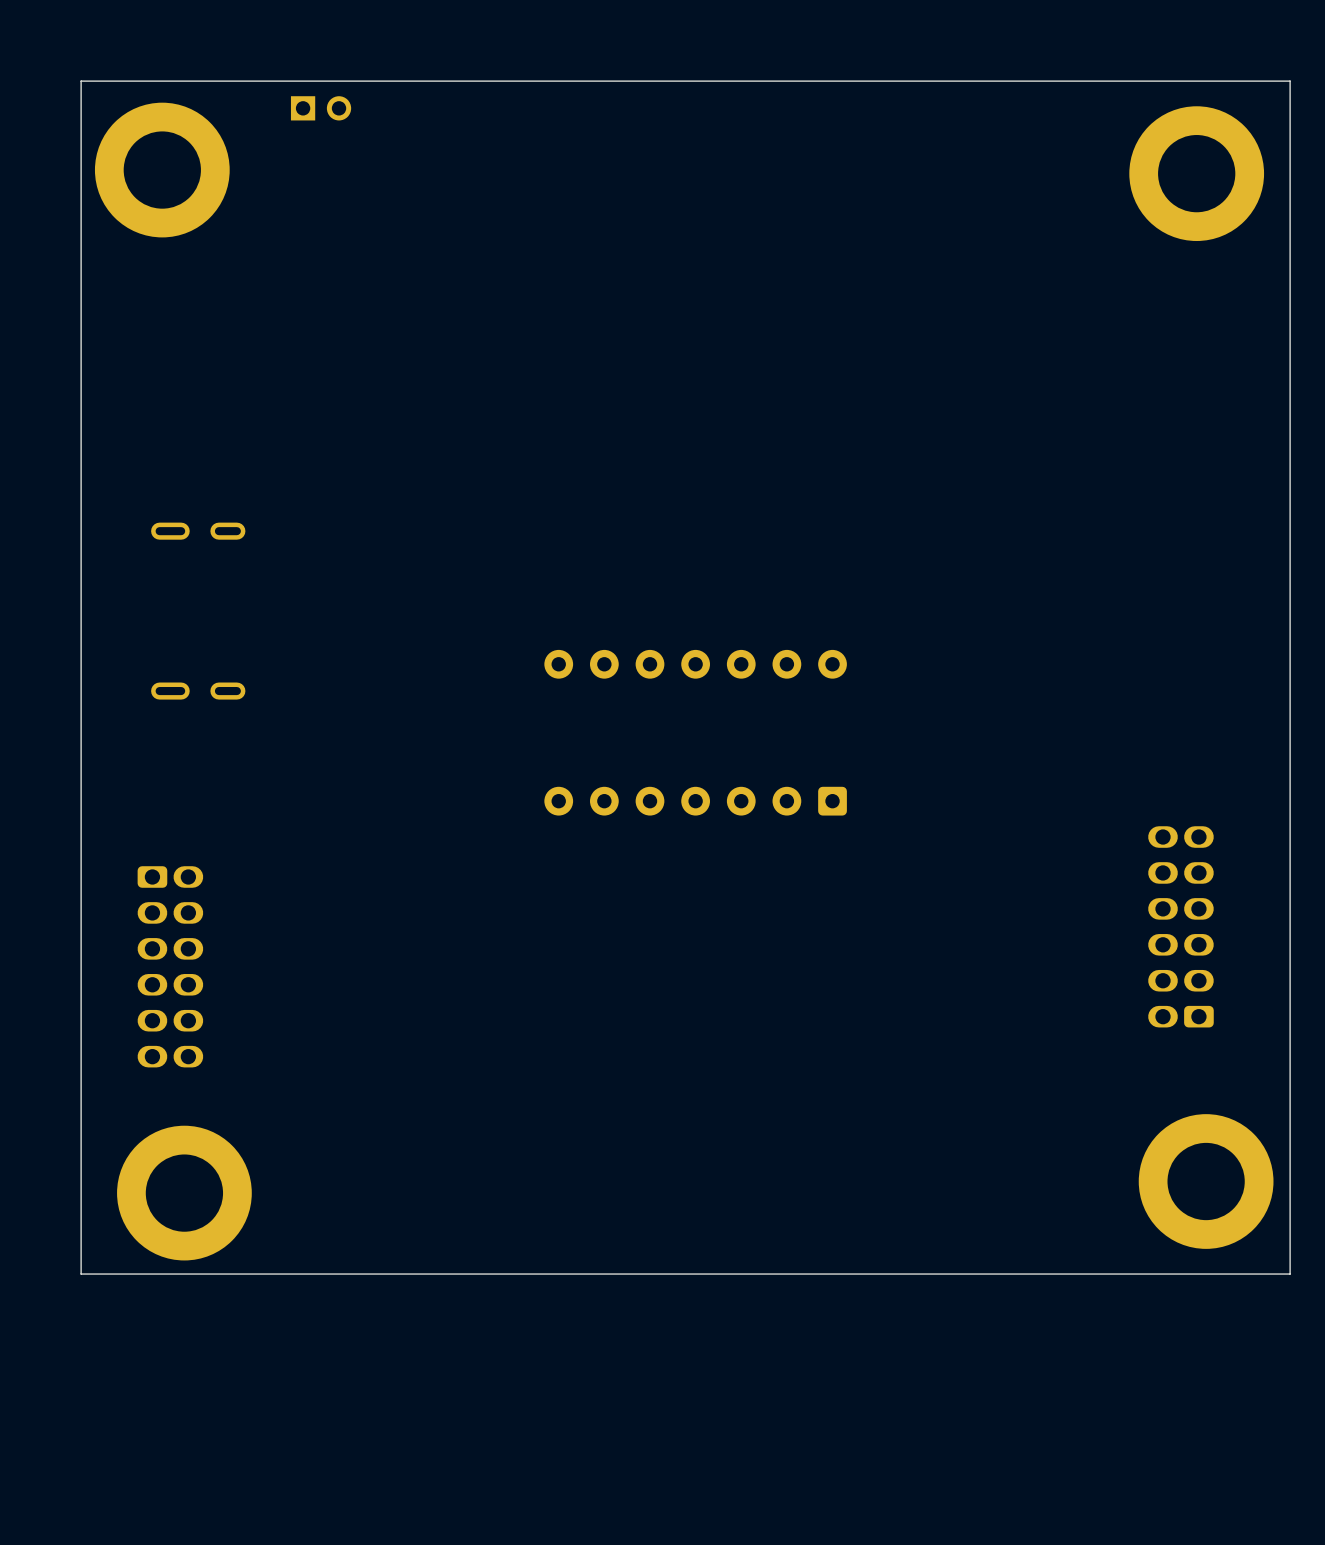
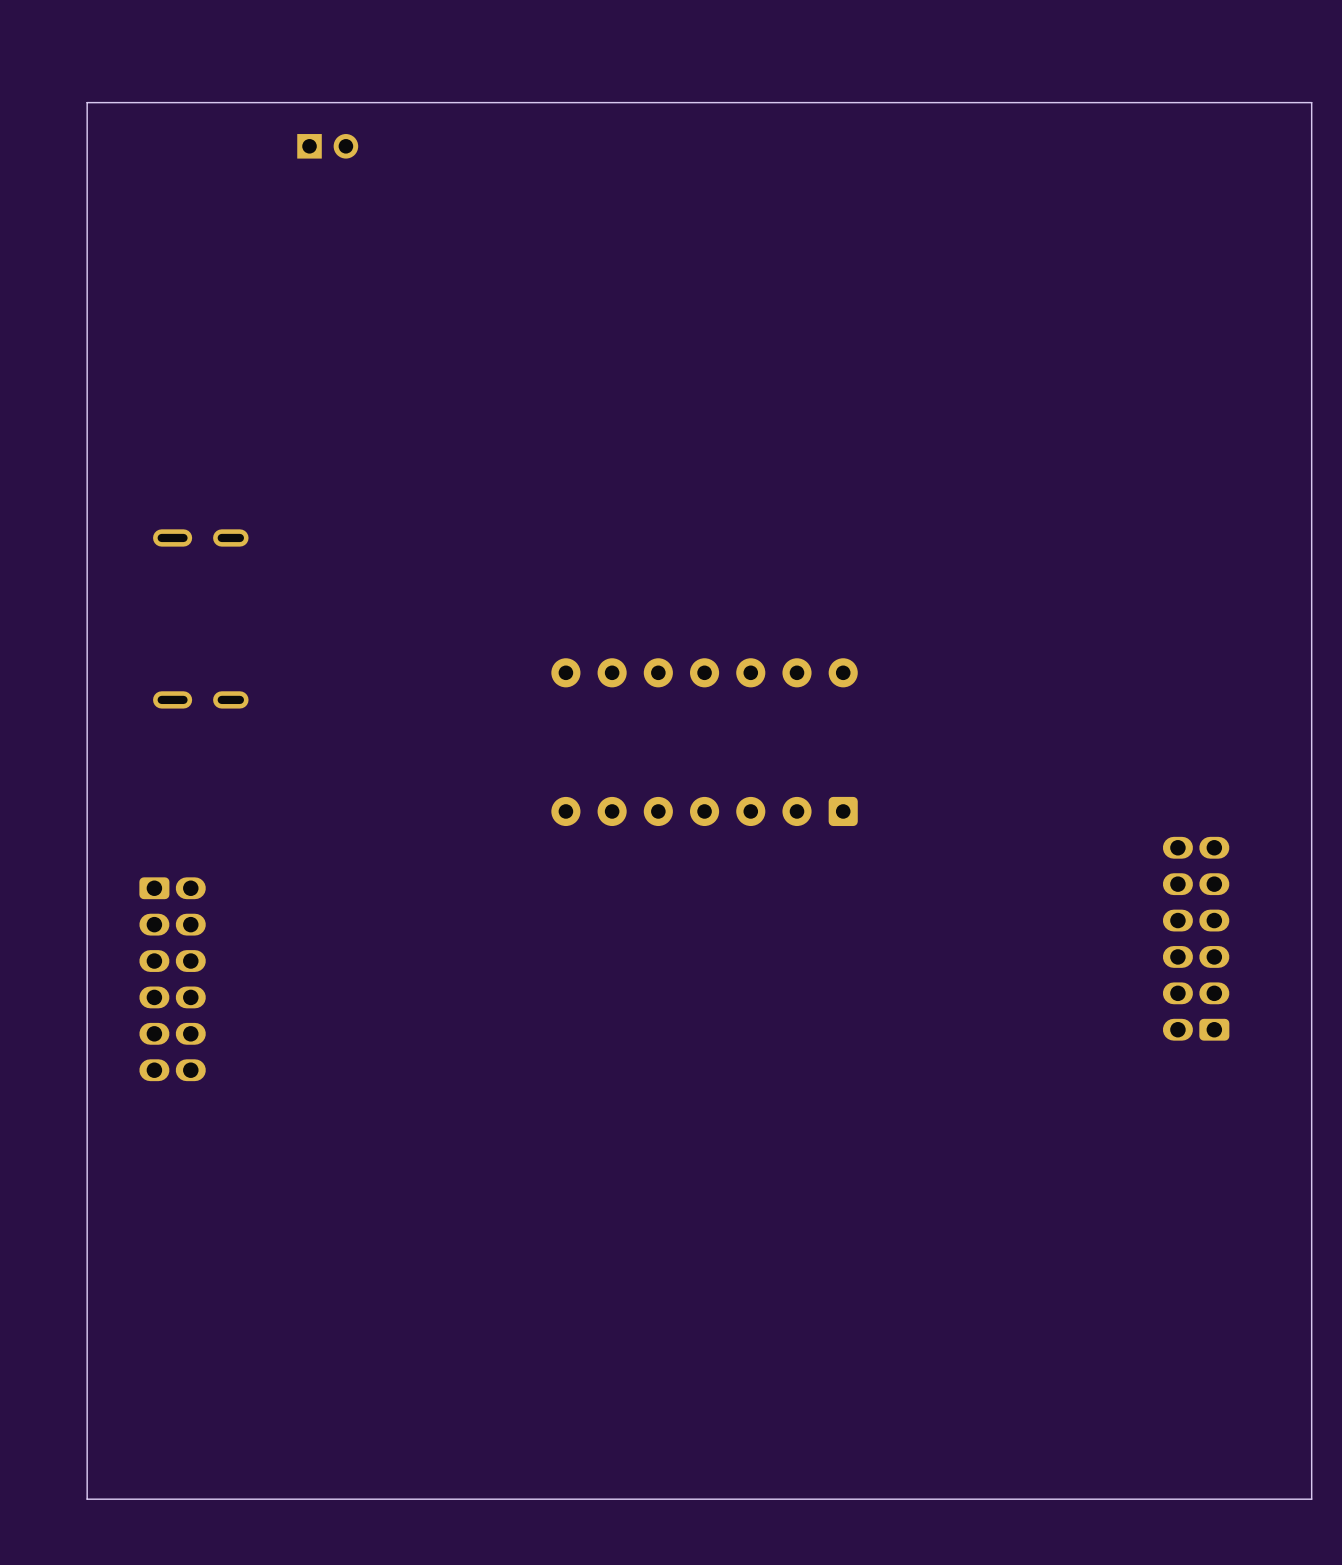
board edge: (1290, 81) (81, 81) (81, 1274) (1290, 1274) (1290, 81) -> (1311, 102) (1311, 1499) (87, 1499) (87, 102) (1311, 102)
part position: (321, 108) -> (327, 146)
part: (162, 170) -> none
part: (1196, 173) -> none
part: (1206, 1181) -> none
part: (184, 1193) -> none

